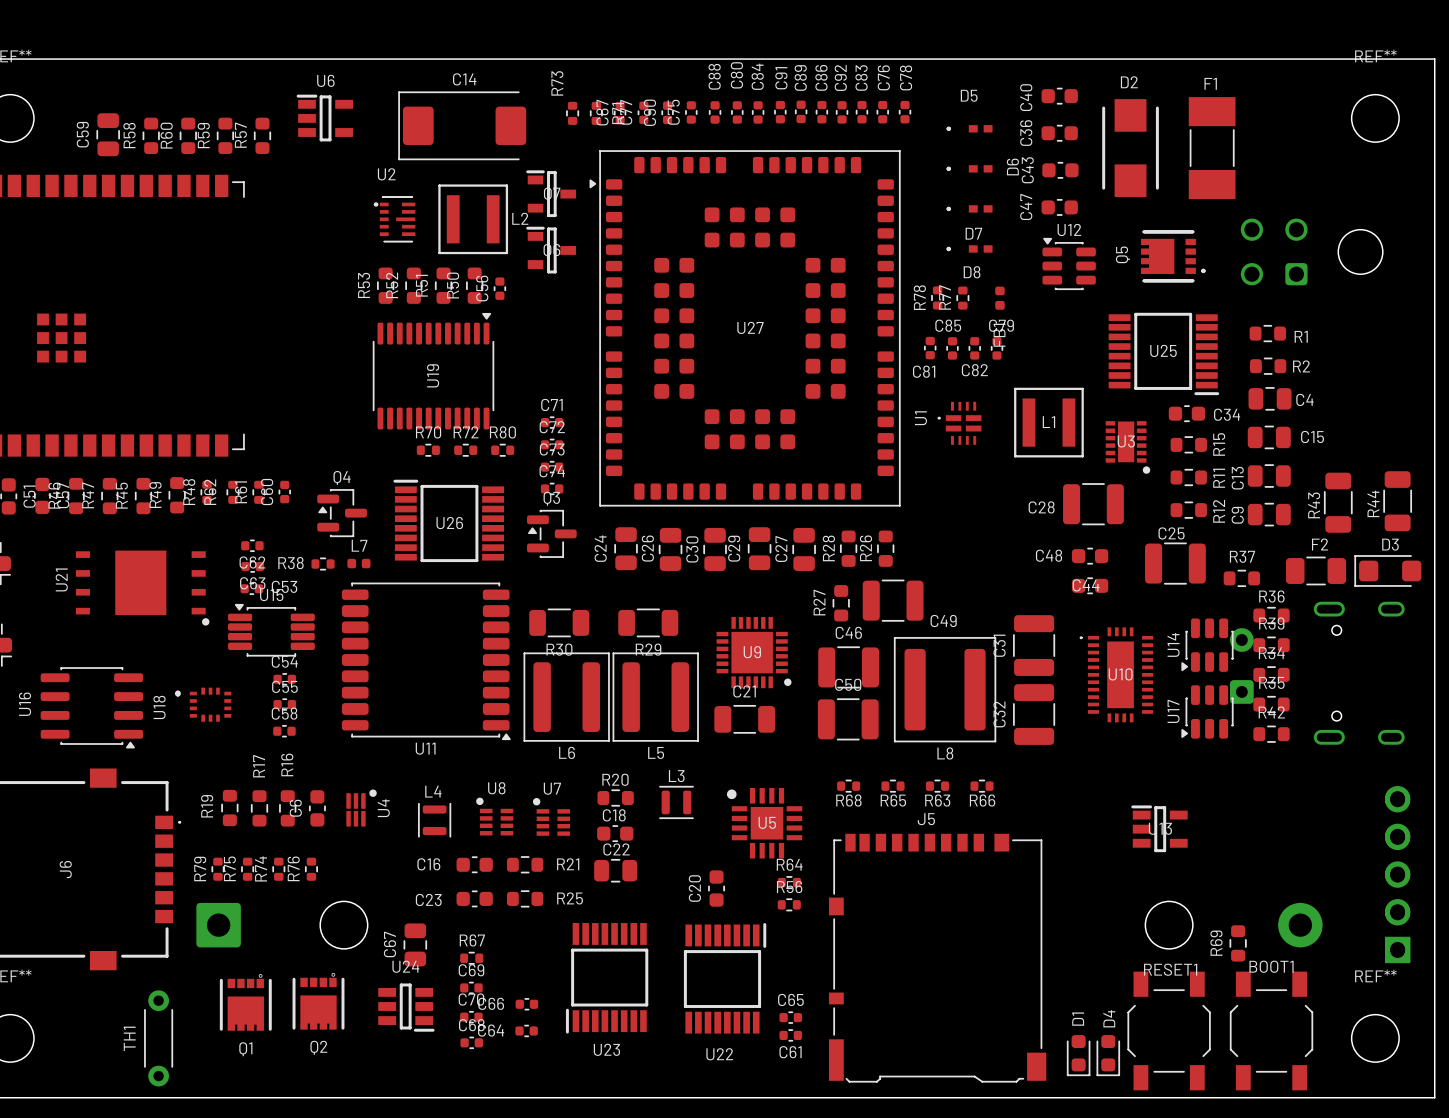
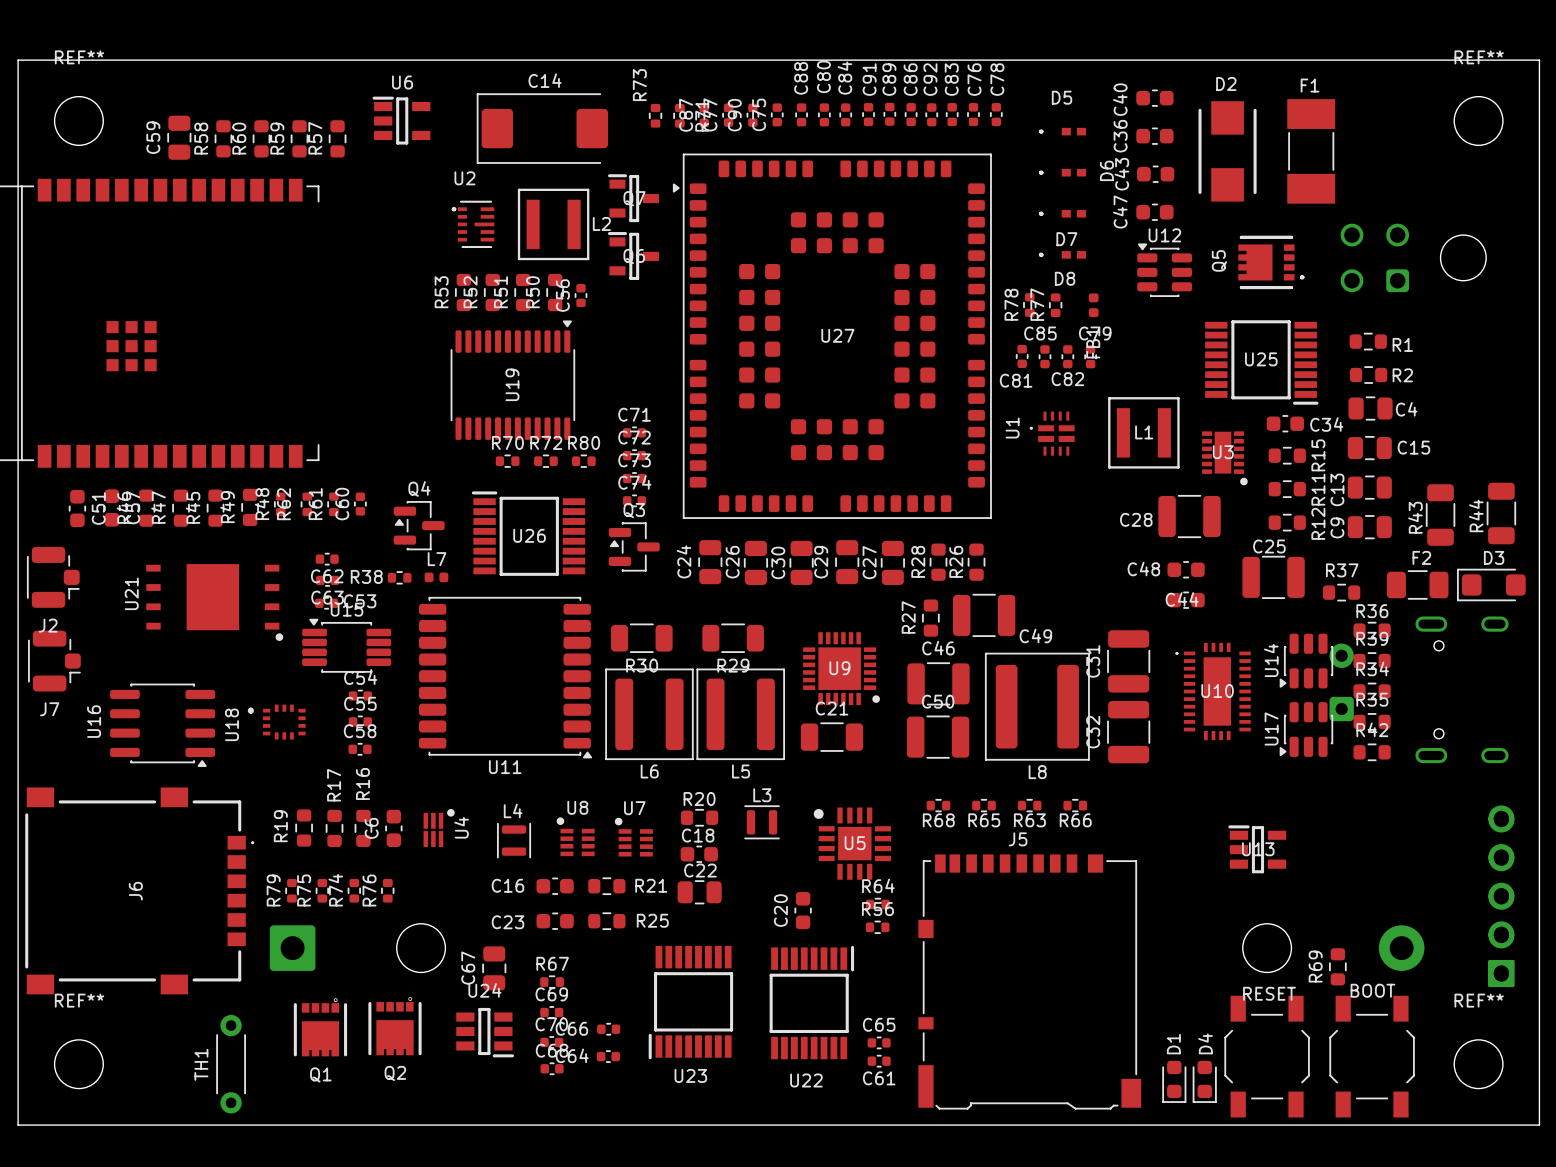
BOOT1 name: BOOT1 (1271, 966) -> BOOT (1372, 990)
RESET1 name: RESET1 (1170, 969) -> RESET (1269, 993)

